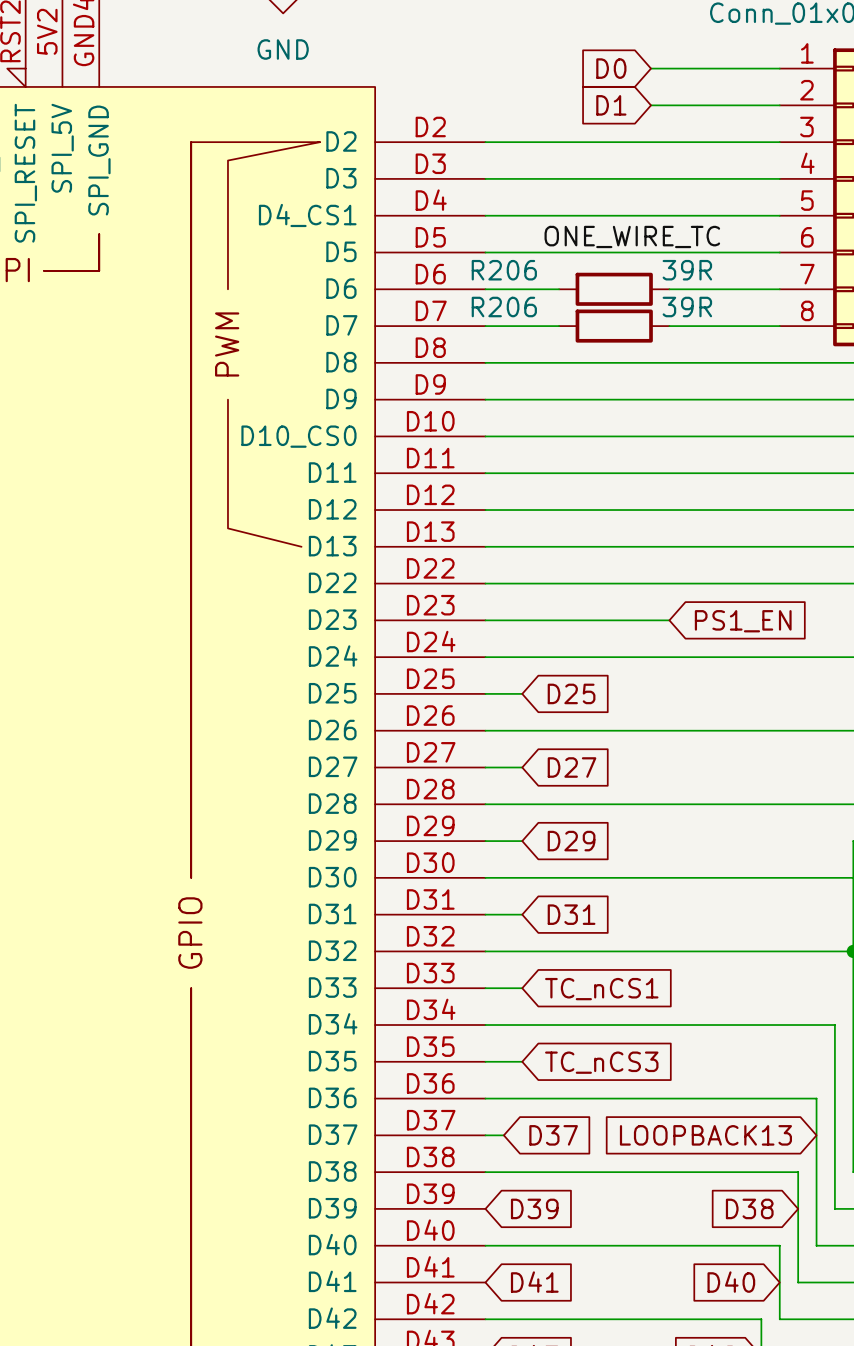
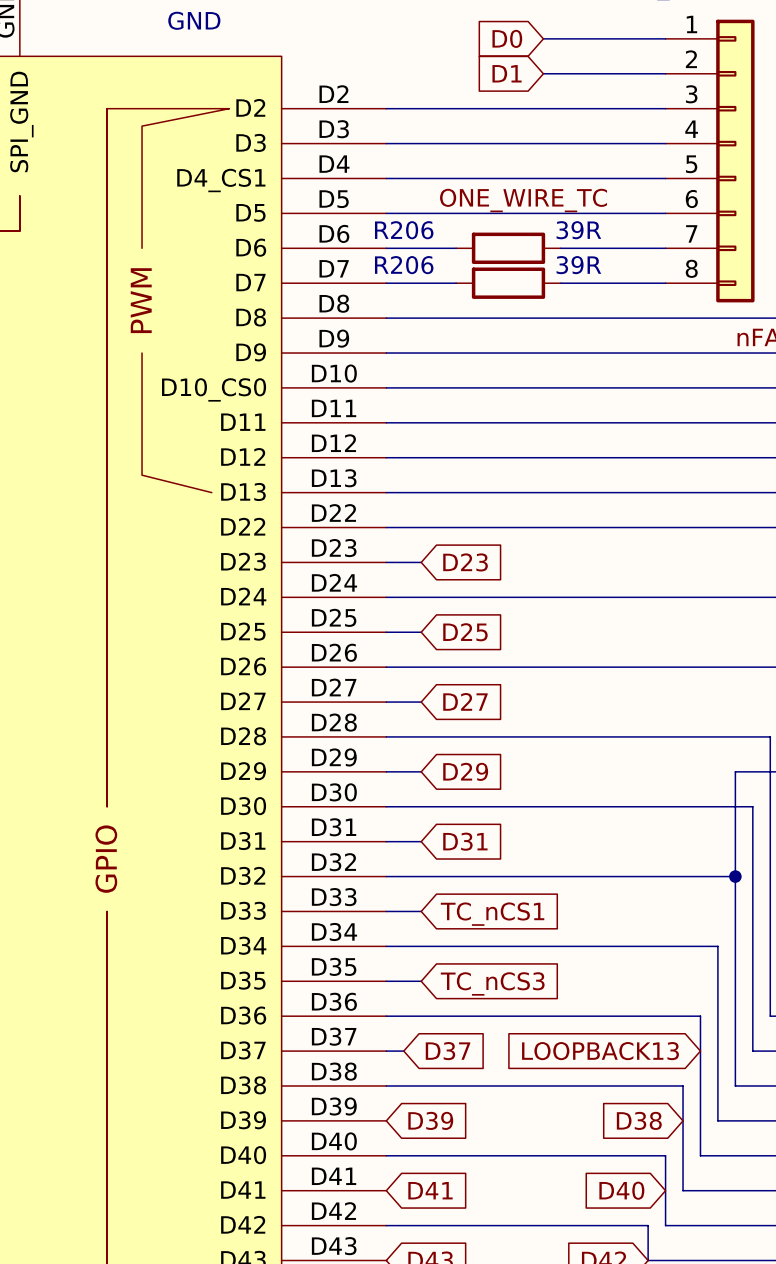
wire: (522, 620) (669, 620) -> none
global label: none -> D23 (465, 562)
global label: PS1_EN (743, 621) -> none

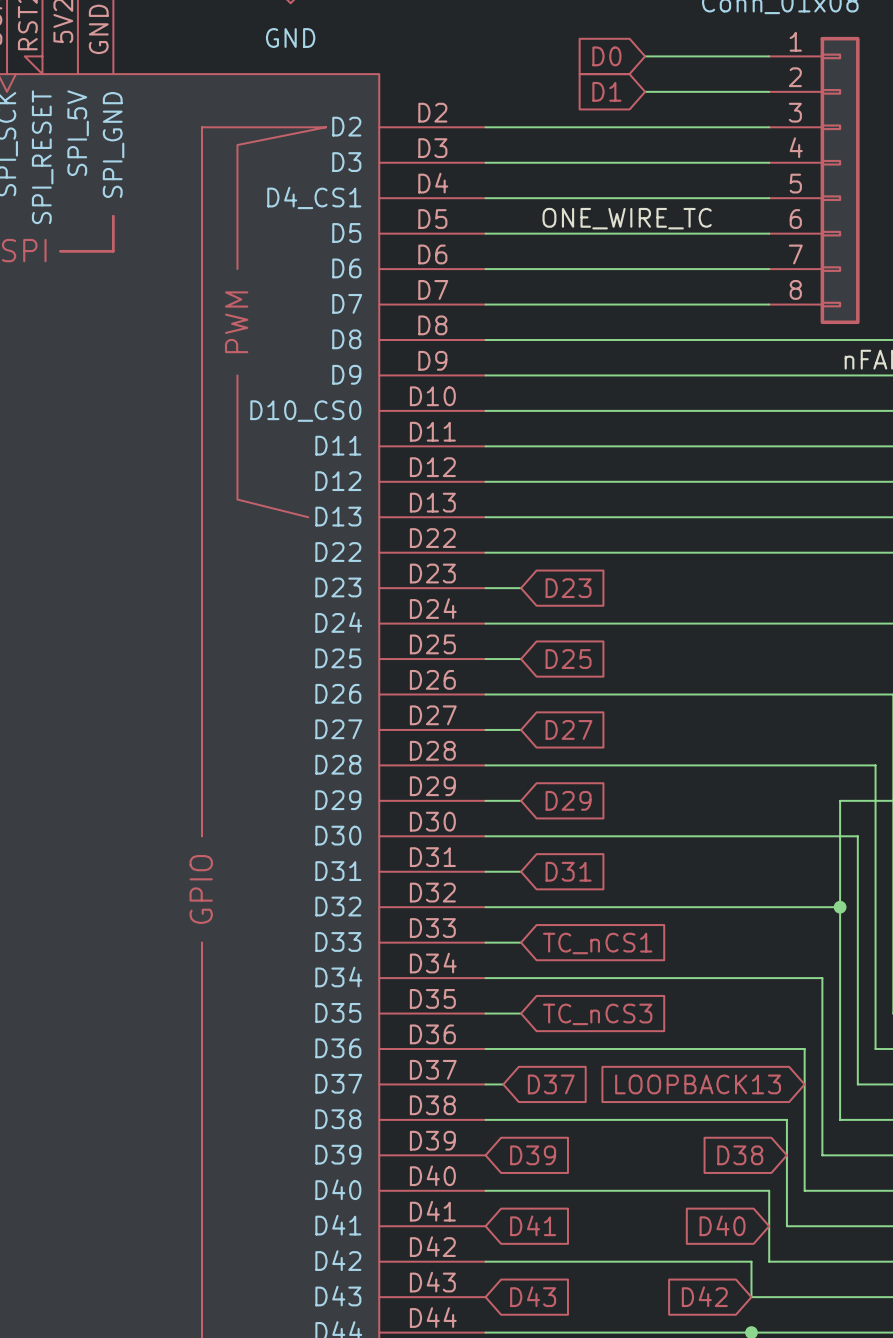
wire: none -> (556, 269) (662, 269)
R206: 39R (508, 248) -> none
wire: none -> (556, 304) (662, 304)
R206: 39R (508, 283) -> none

